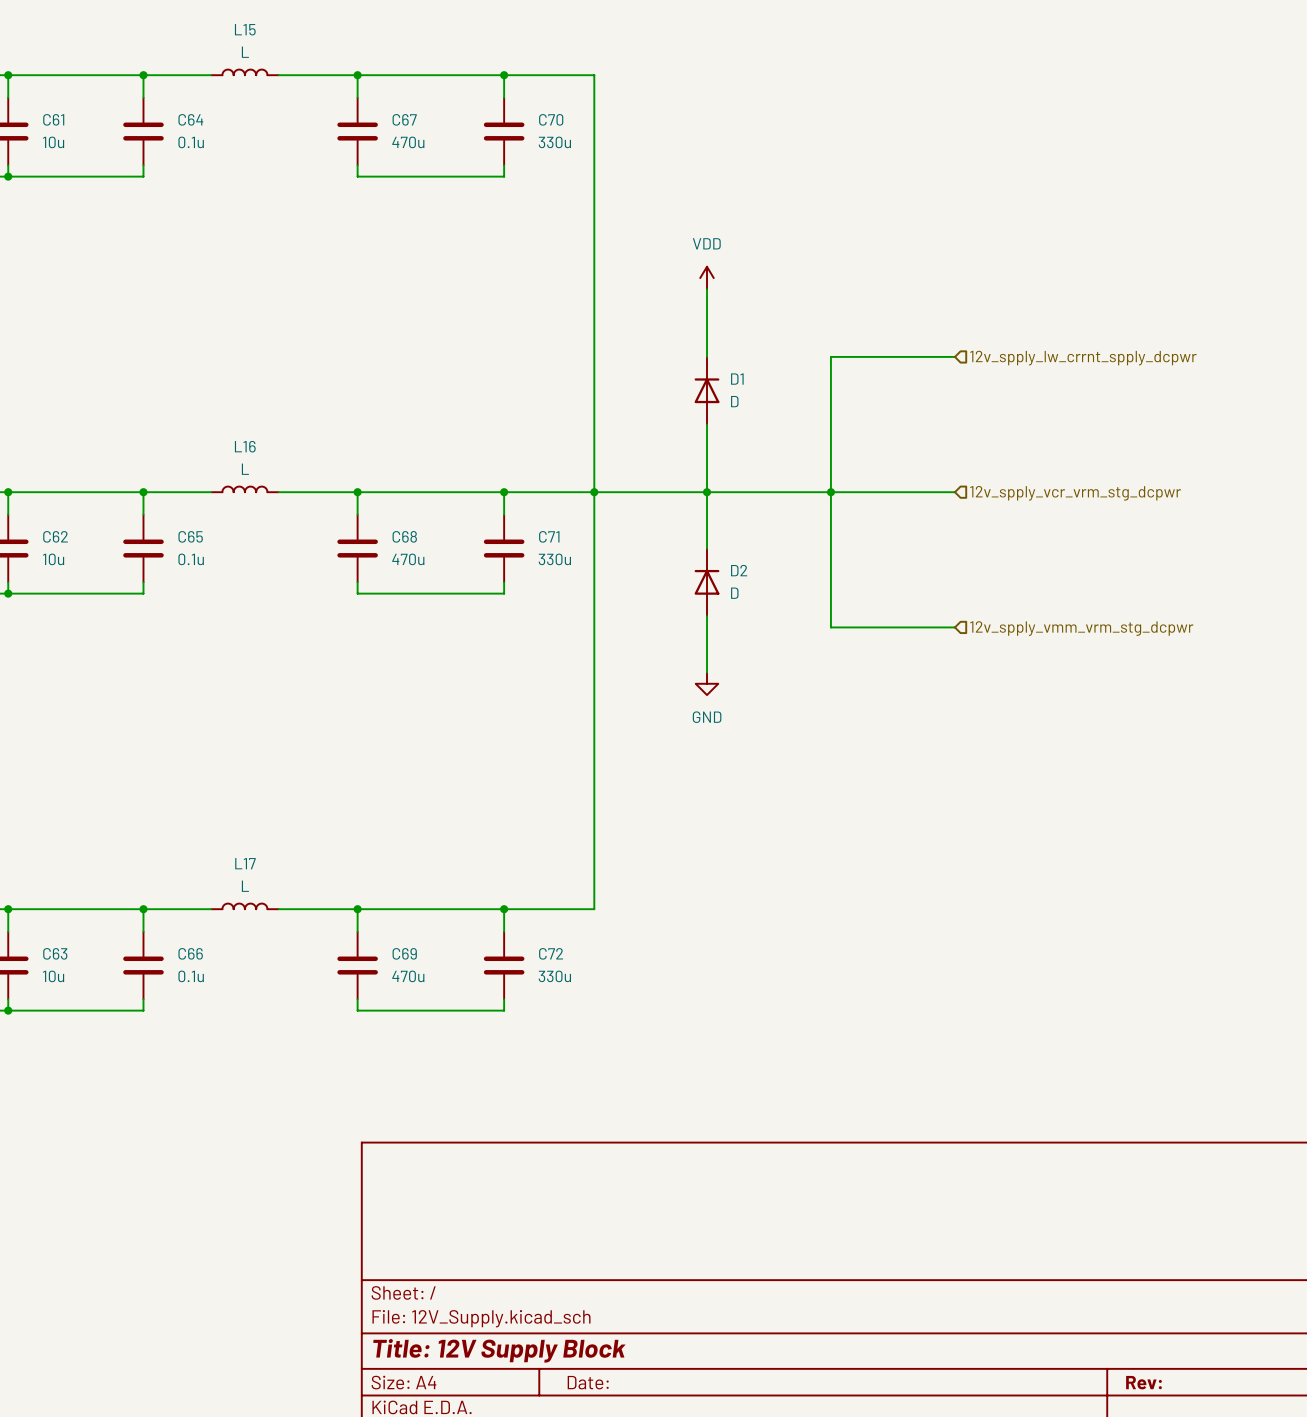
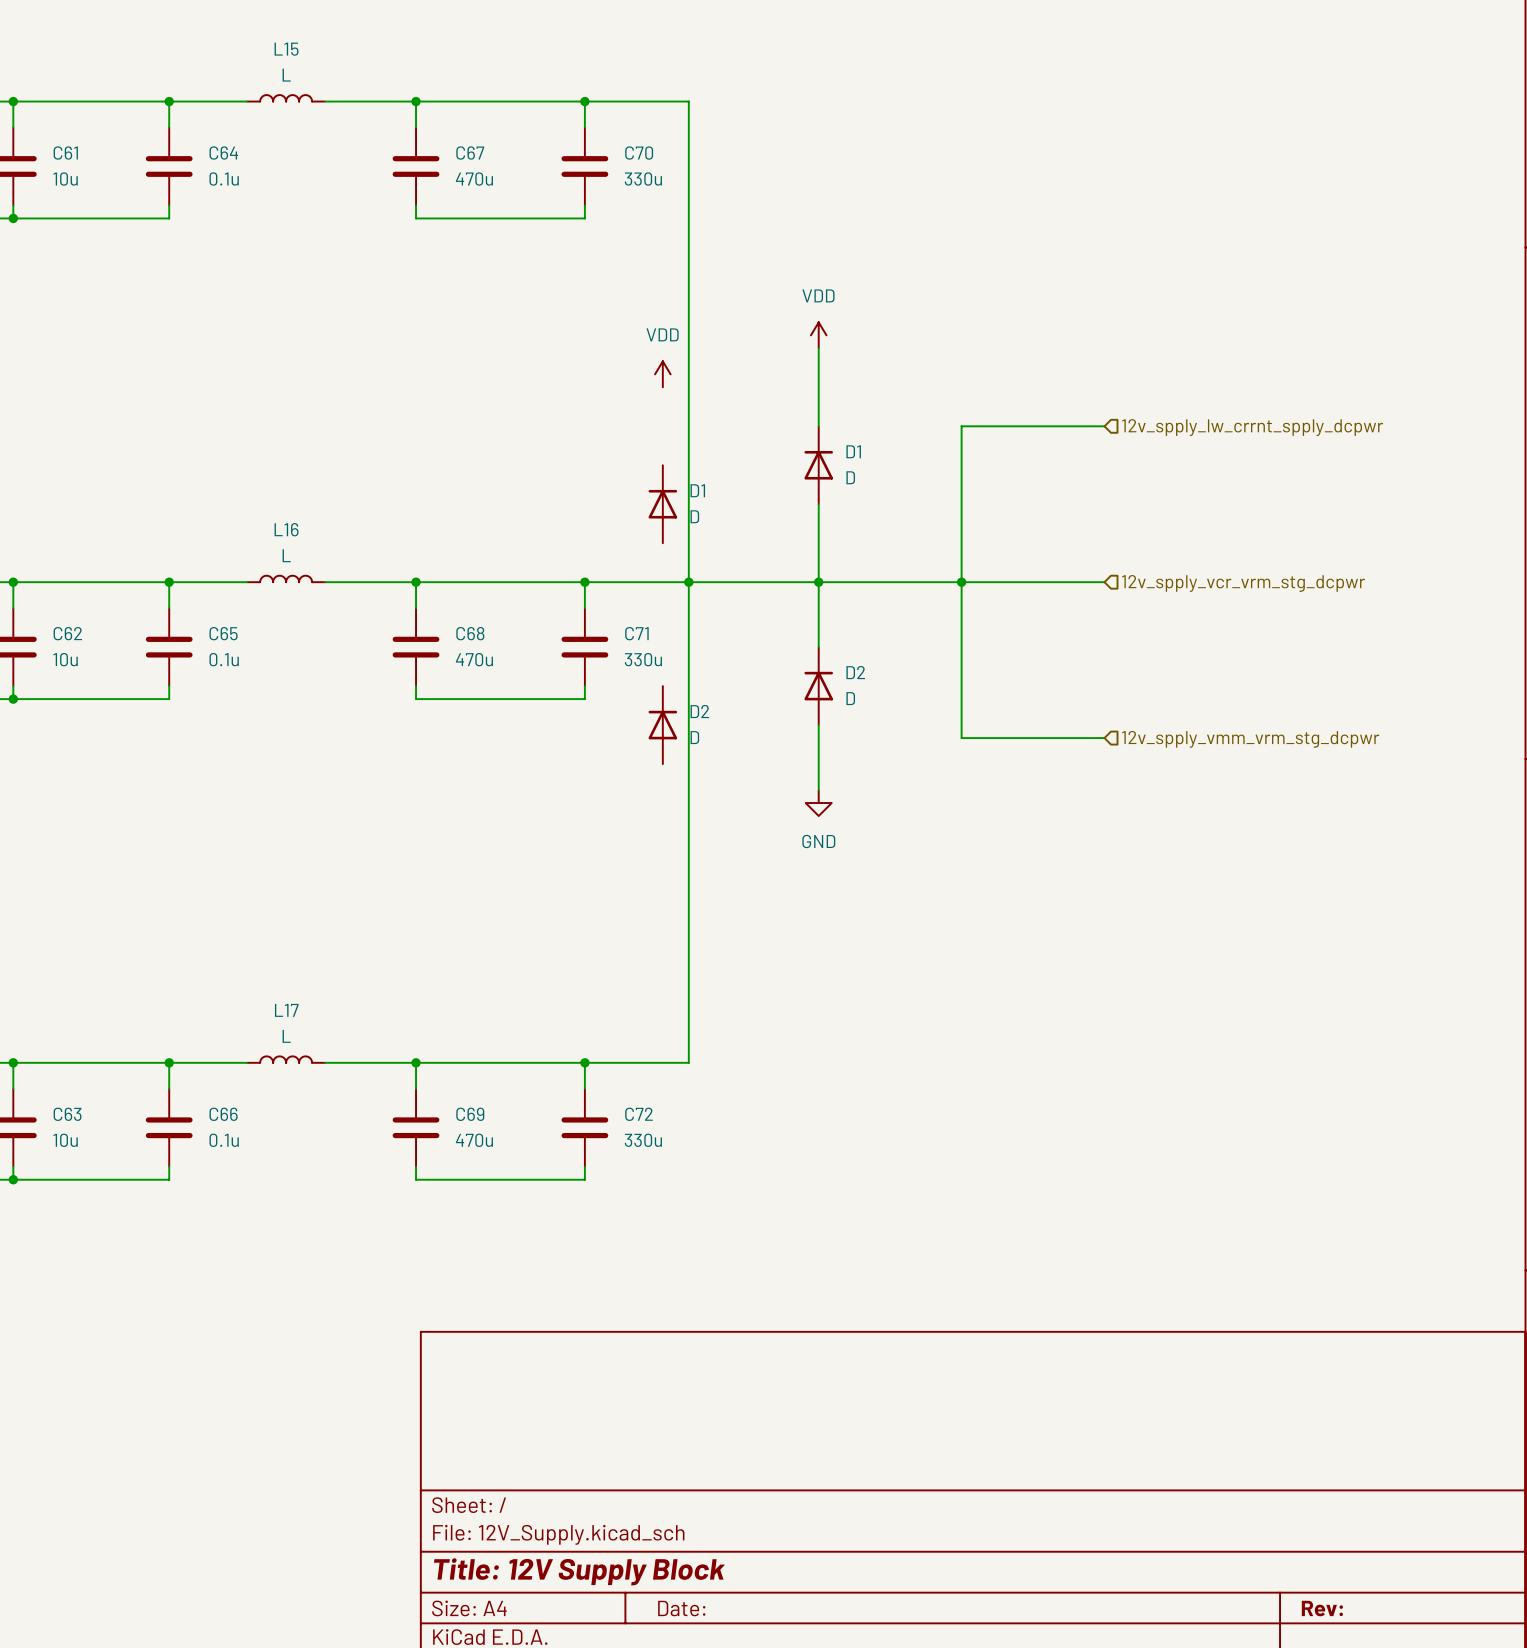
power symbol: none -> VDD (662, 374)
D1: none -> D (662, 504)
D2: none -> D (662, 725)

